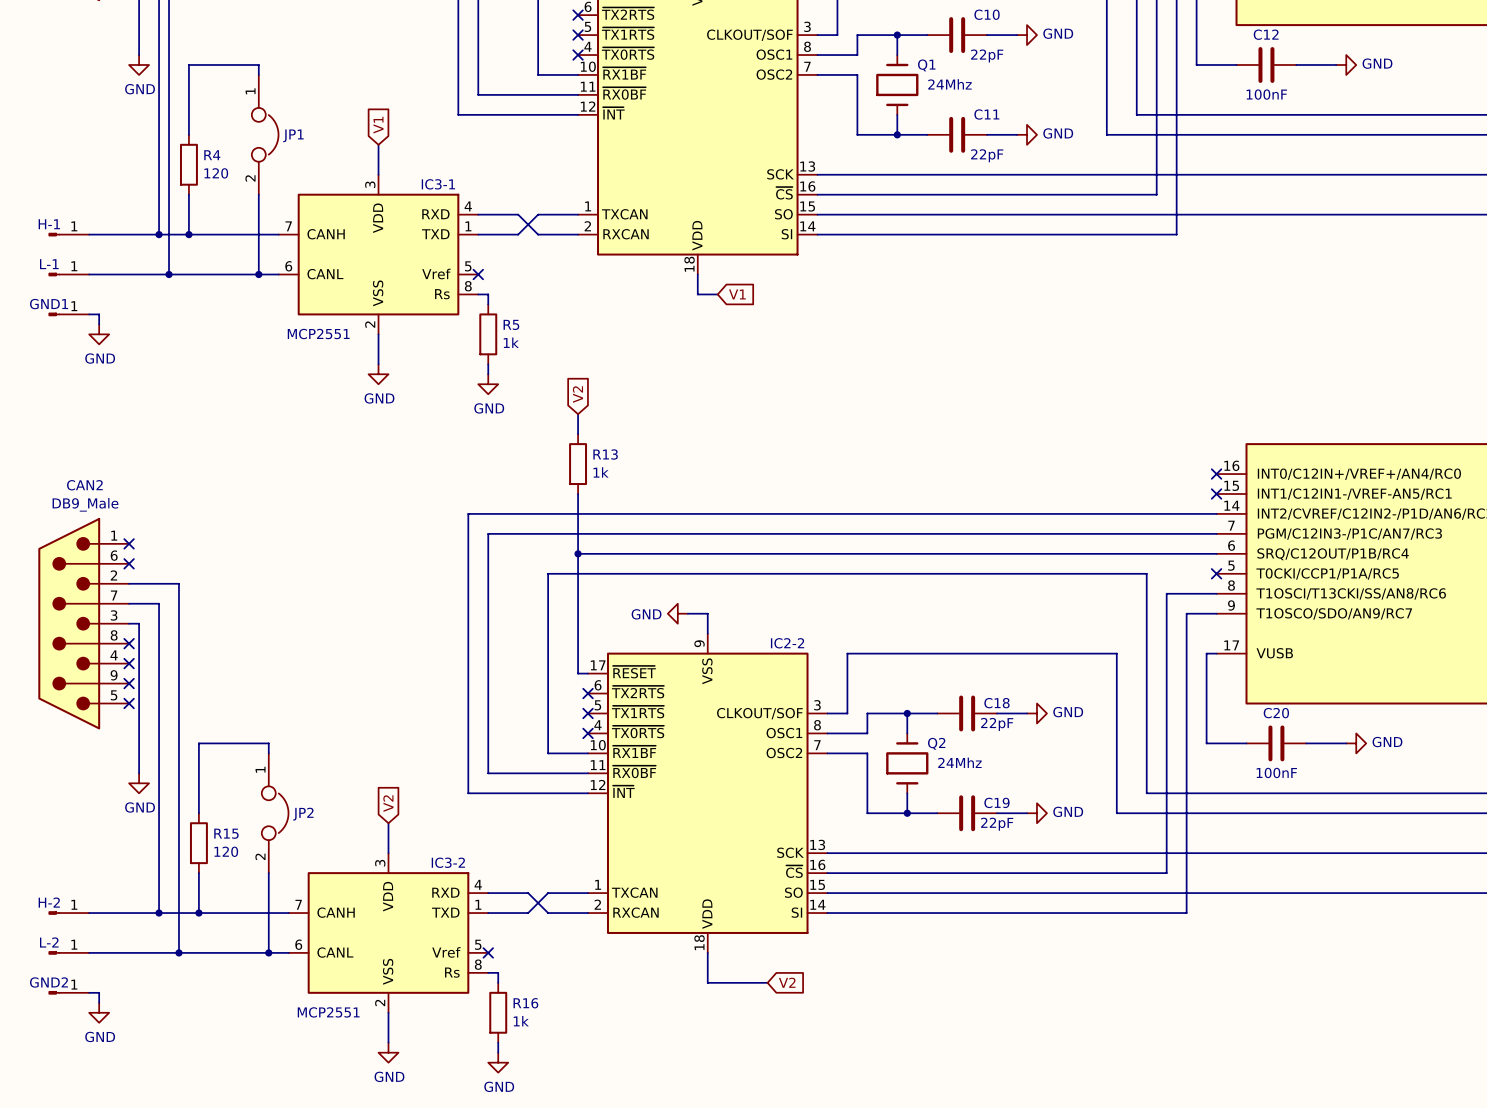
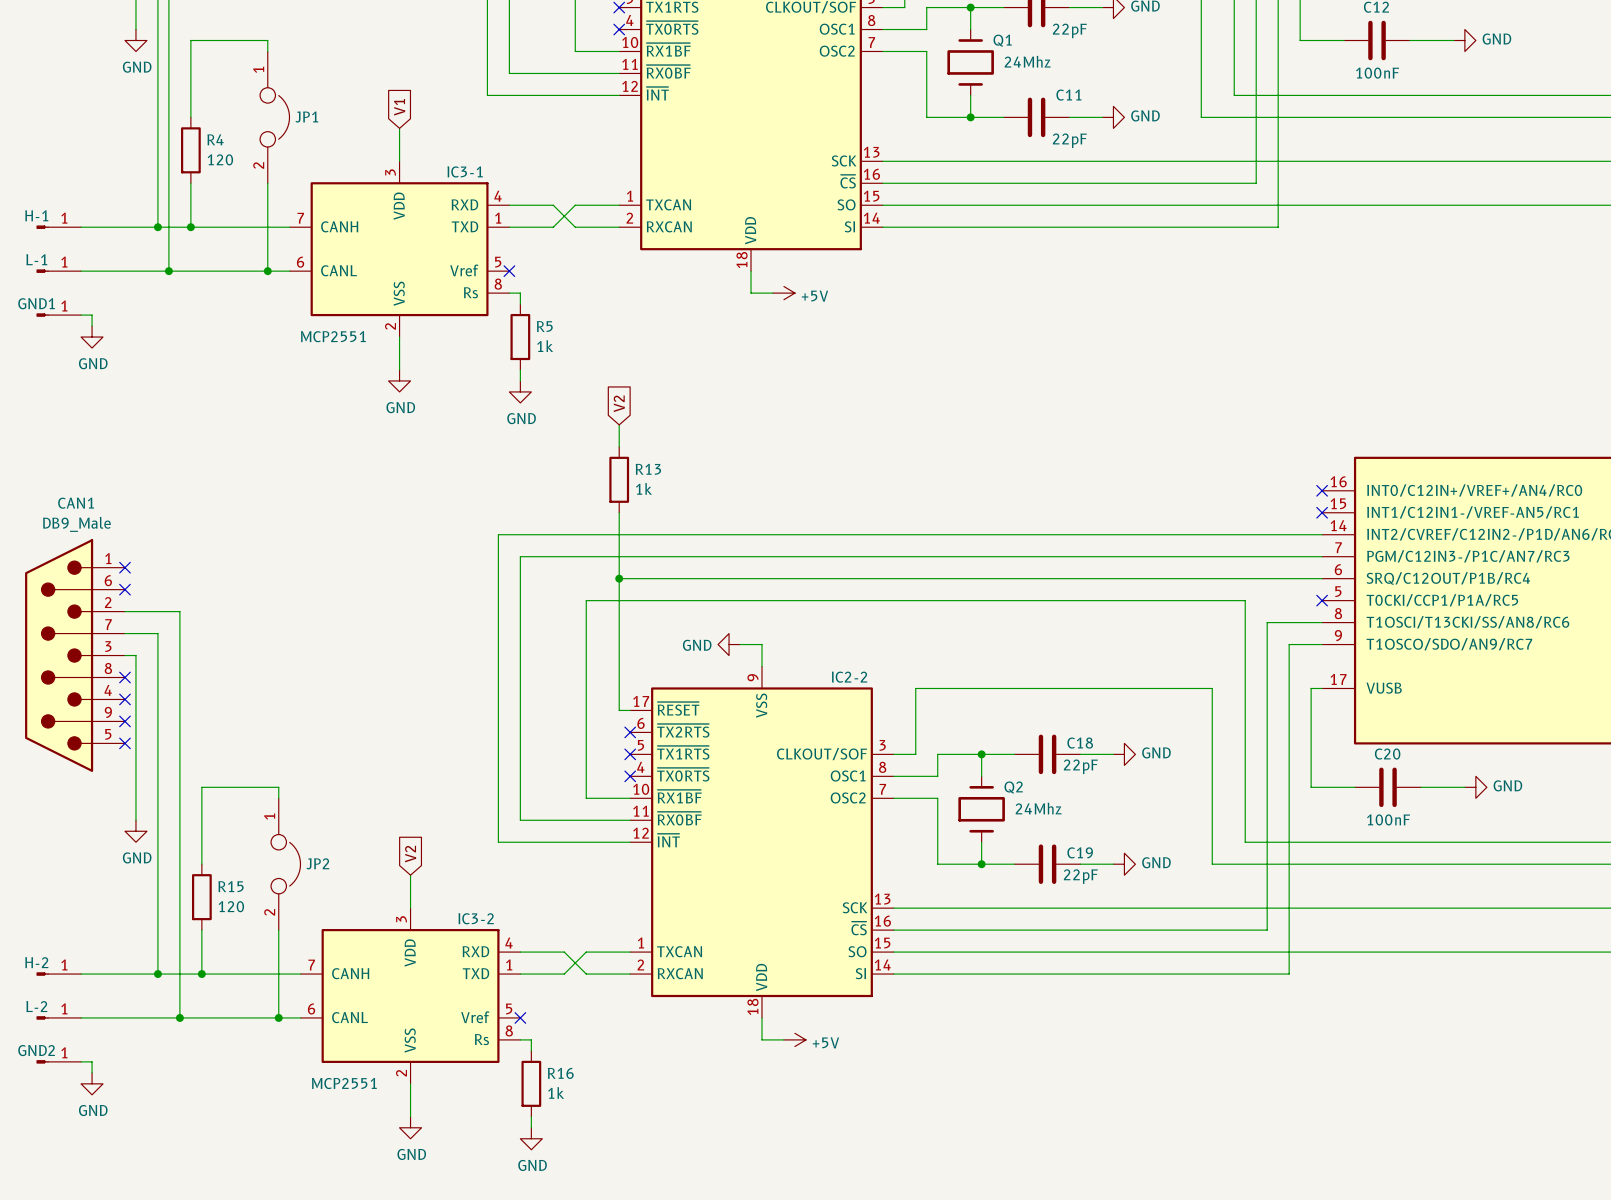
power symbol: none -> +5V (783, 293)
global label: V1 (737, 294) -> none
CAN2 name: CAN2 (84, 485) -> CAN1 (76, 503)
wire: (707, 972) (707, 982) (767, 982) -> (761, 1039) (783, 1039)
power symbol: none -> +5V (794, 1039)
global label: V2 (787, 982) -> none

